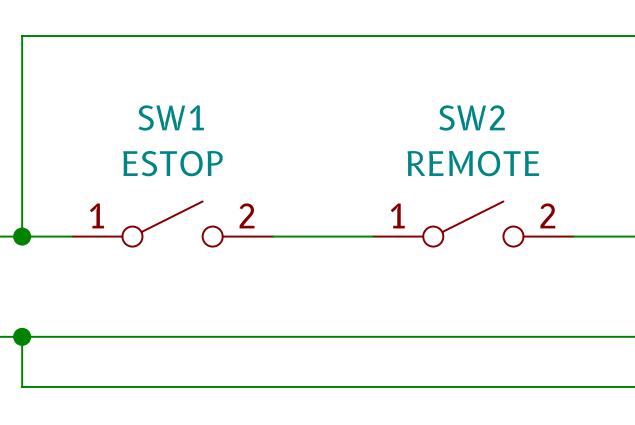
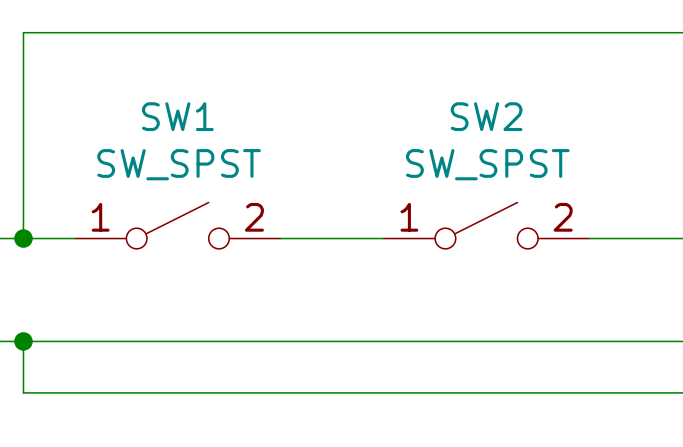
SW1 value: ESTOP (172, 163) -> SW_SPST (179, 164)
SW2 value: REMOTE (473, 163) -> SW_SPST (487, 164)

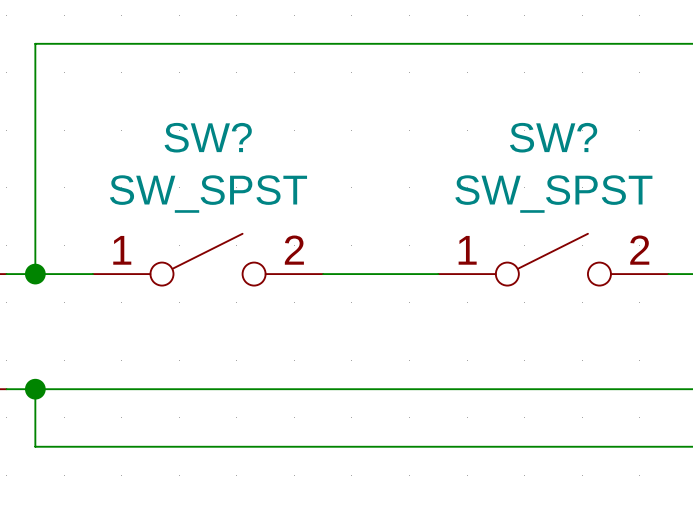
SW1 name: SW1 (177, 116) -> SW? (208, 137)
SW2 name: SW2 (486, 116) -> SW? (553, 137)

